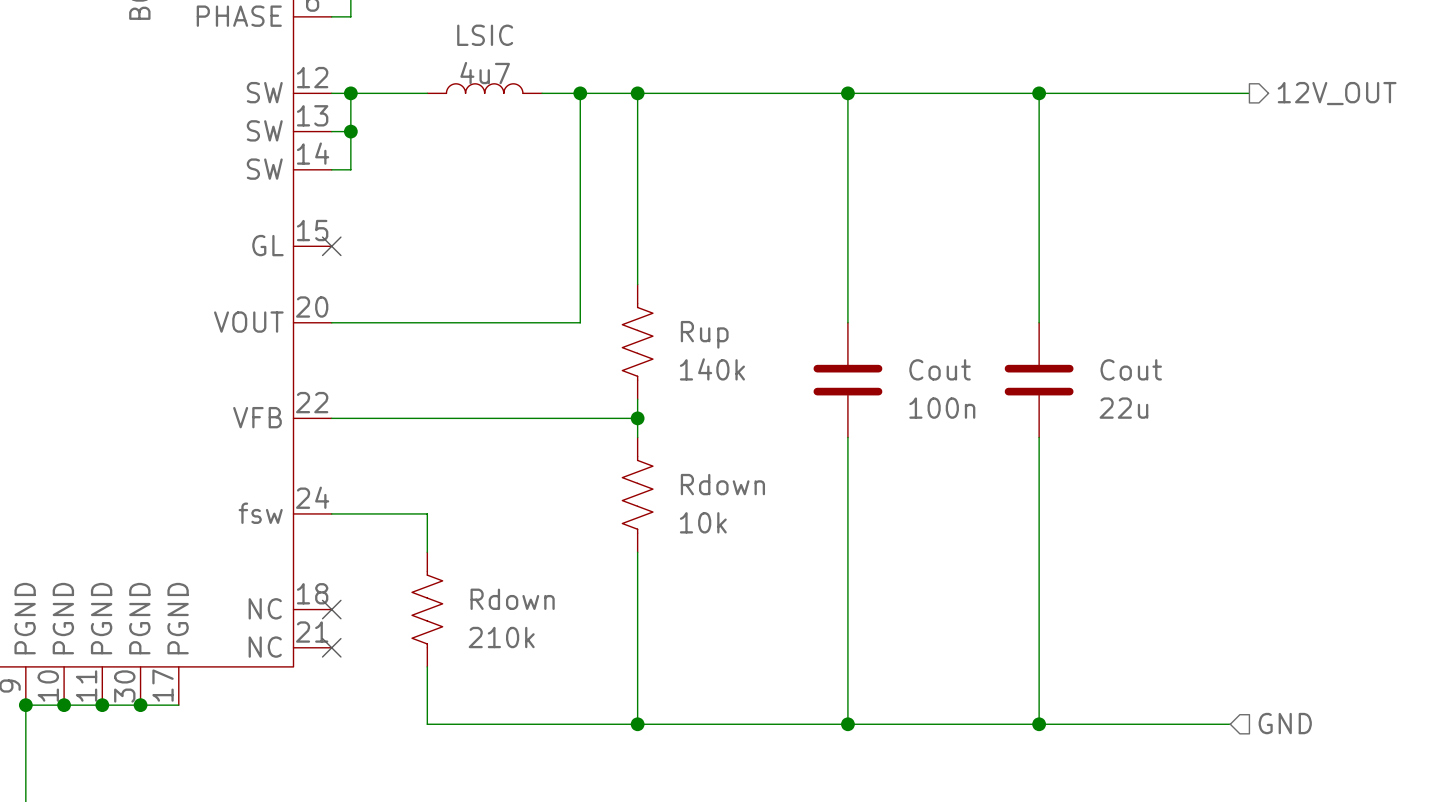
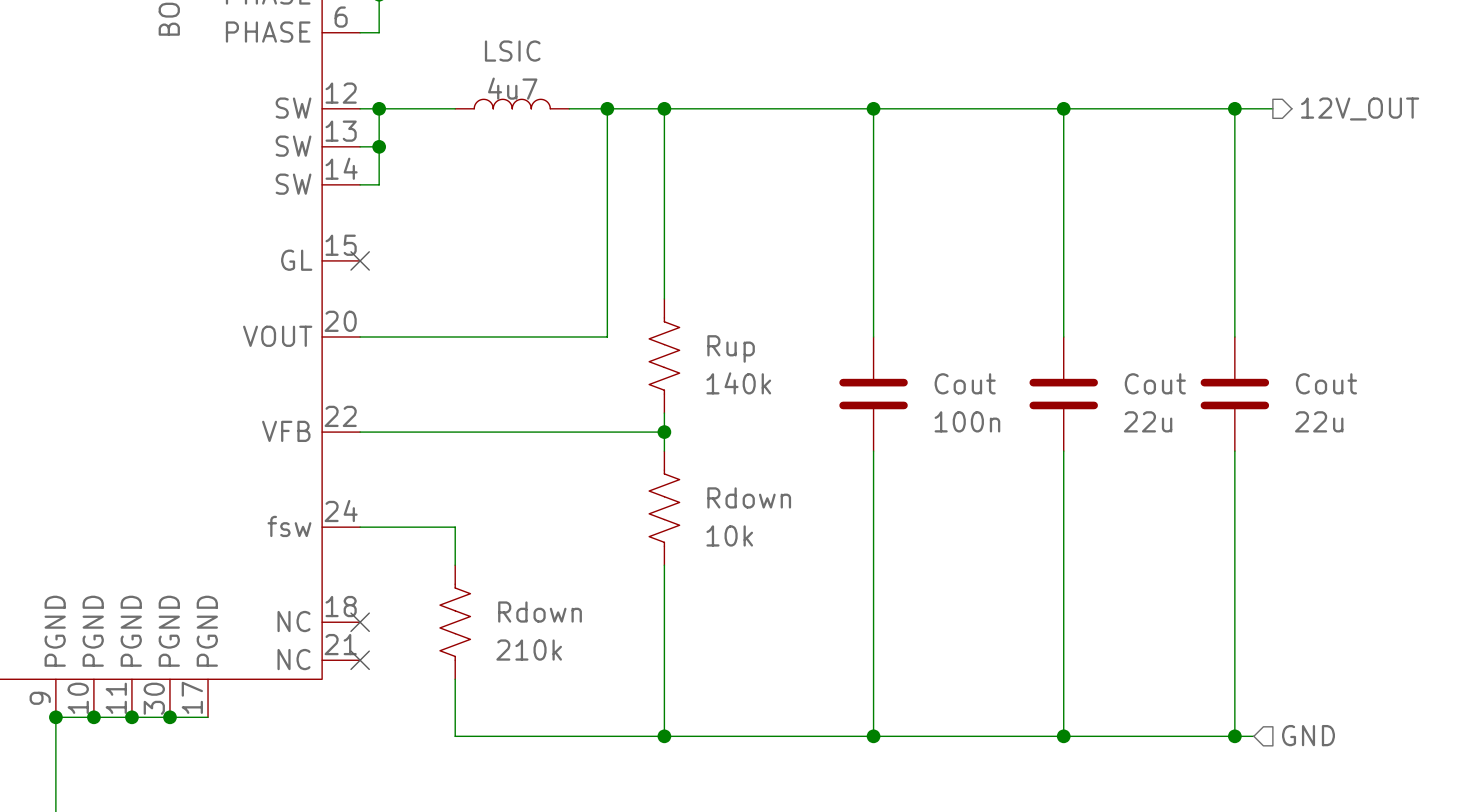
wire: none -> (1234, 108) (1234, 337)
junction: none -> (1234, 108)
Cout: none -> 22u (1234, 394)
wire: none -> (1234, 451) (1234, 736)
junction: none -> (1234, 736)

